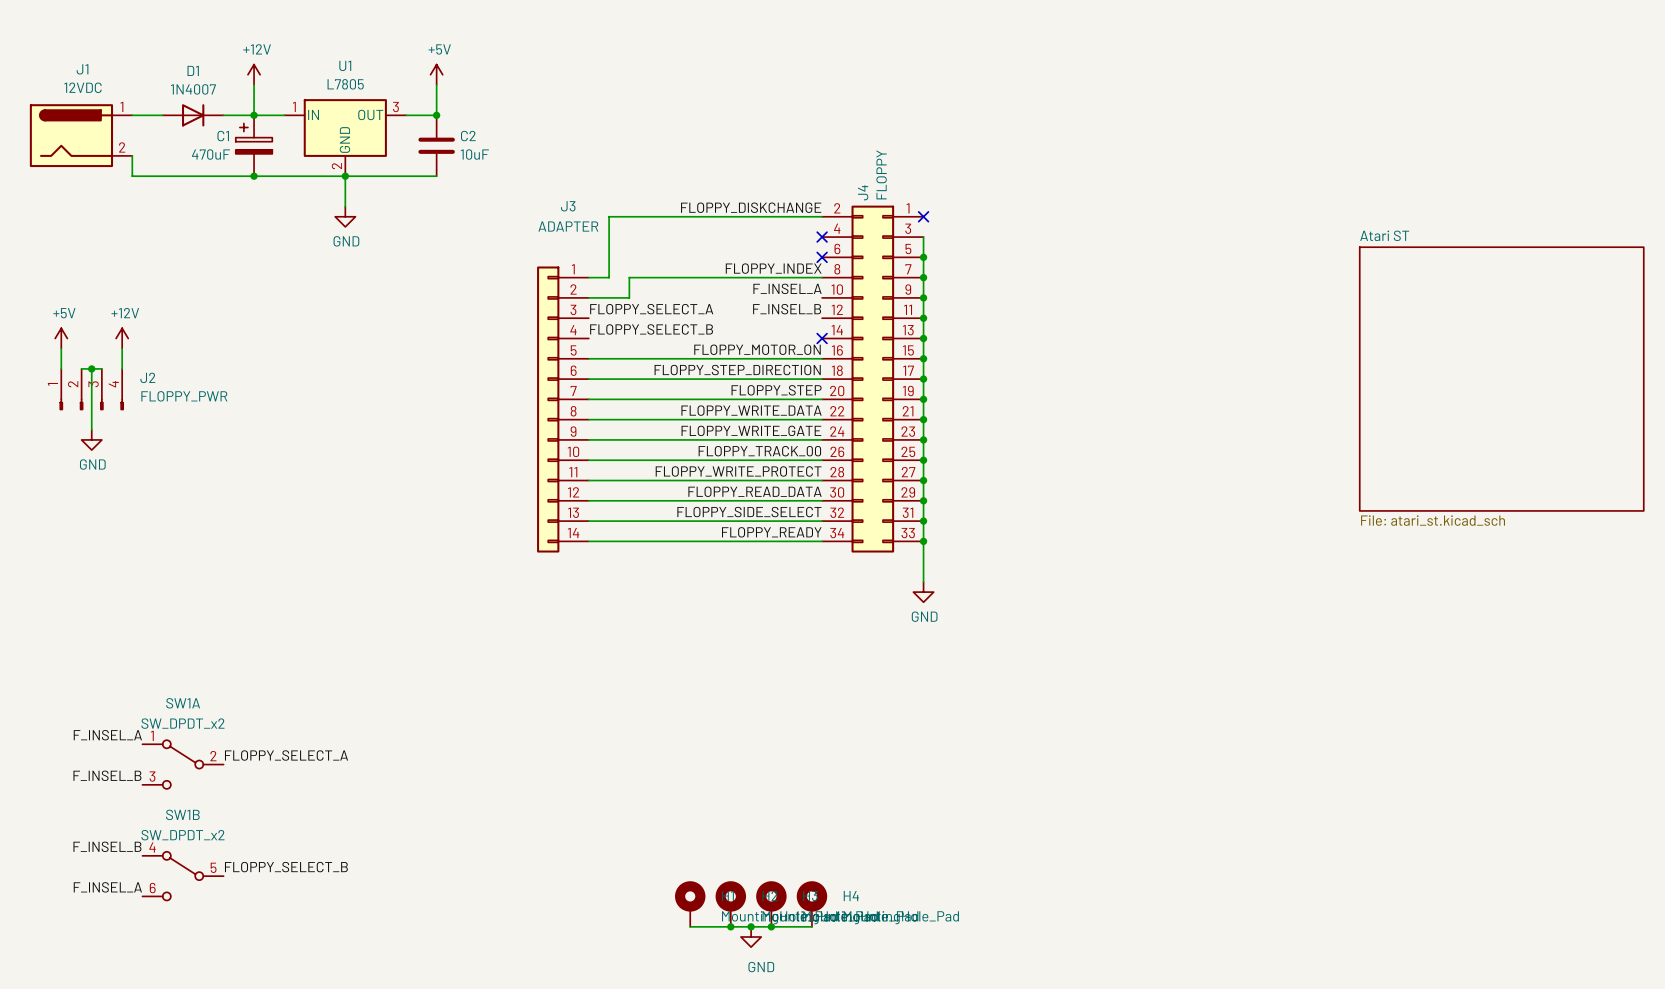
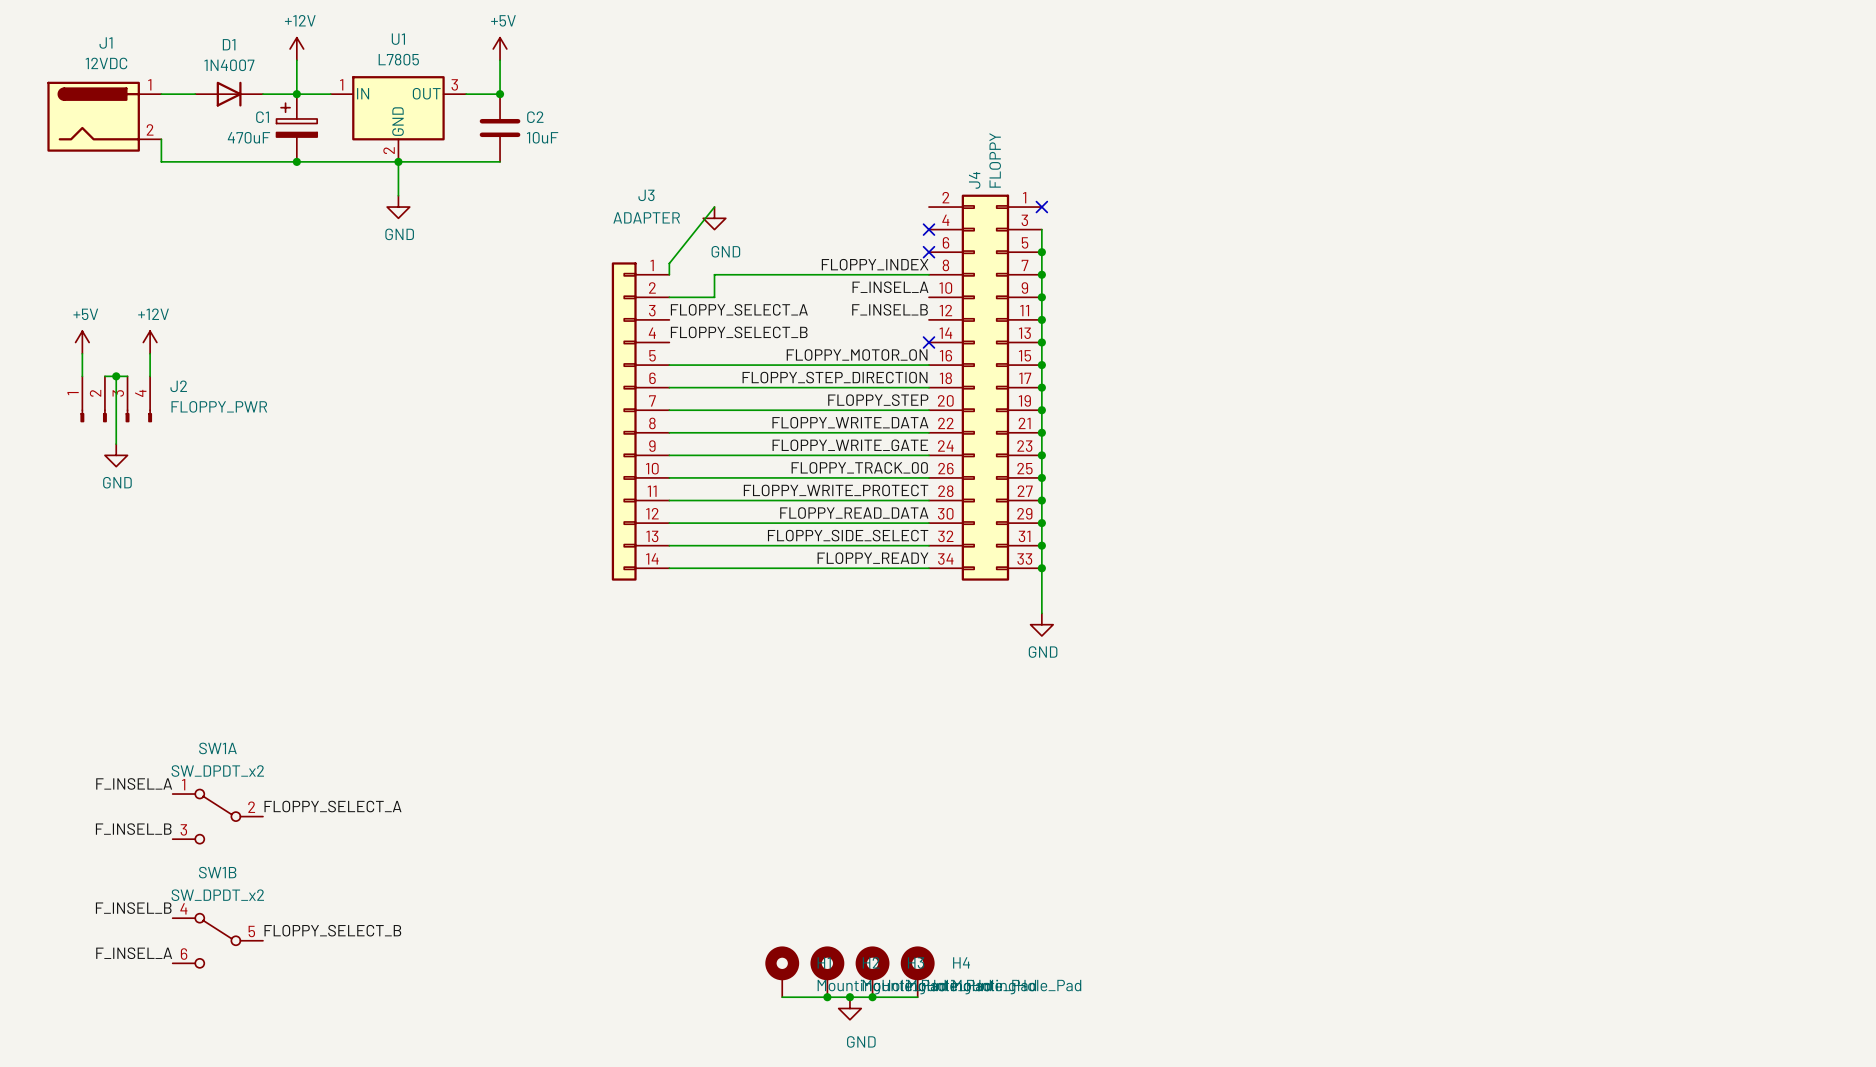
label: FLOPPY_DISKCHANGE (751, 207) -> none
wire: (822, 216) (609, 216) (609, 277) (588, 277) -> (714, 207) (669, 263) (669, 274)
power symbol: none -> GND (714, 218)
sheet Atari ST: File: atari_st.kicad_sch (1501, 379) -> none

